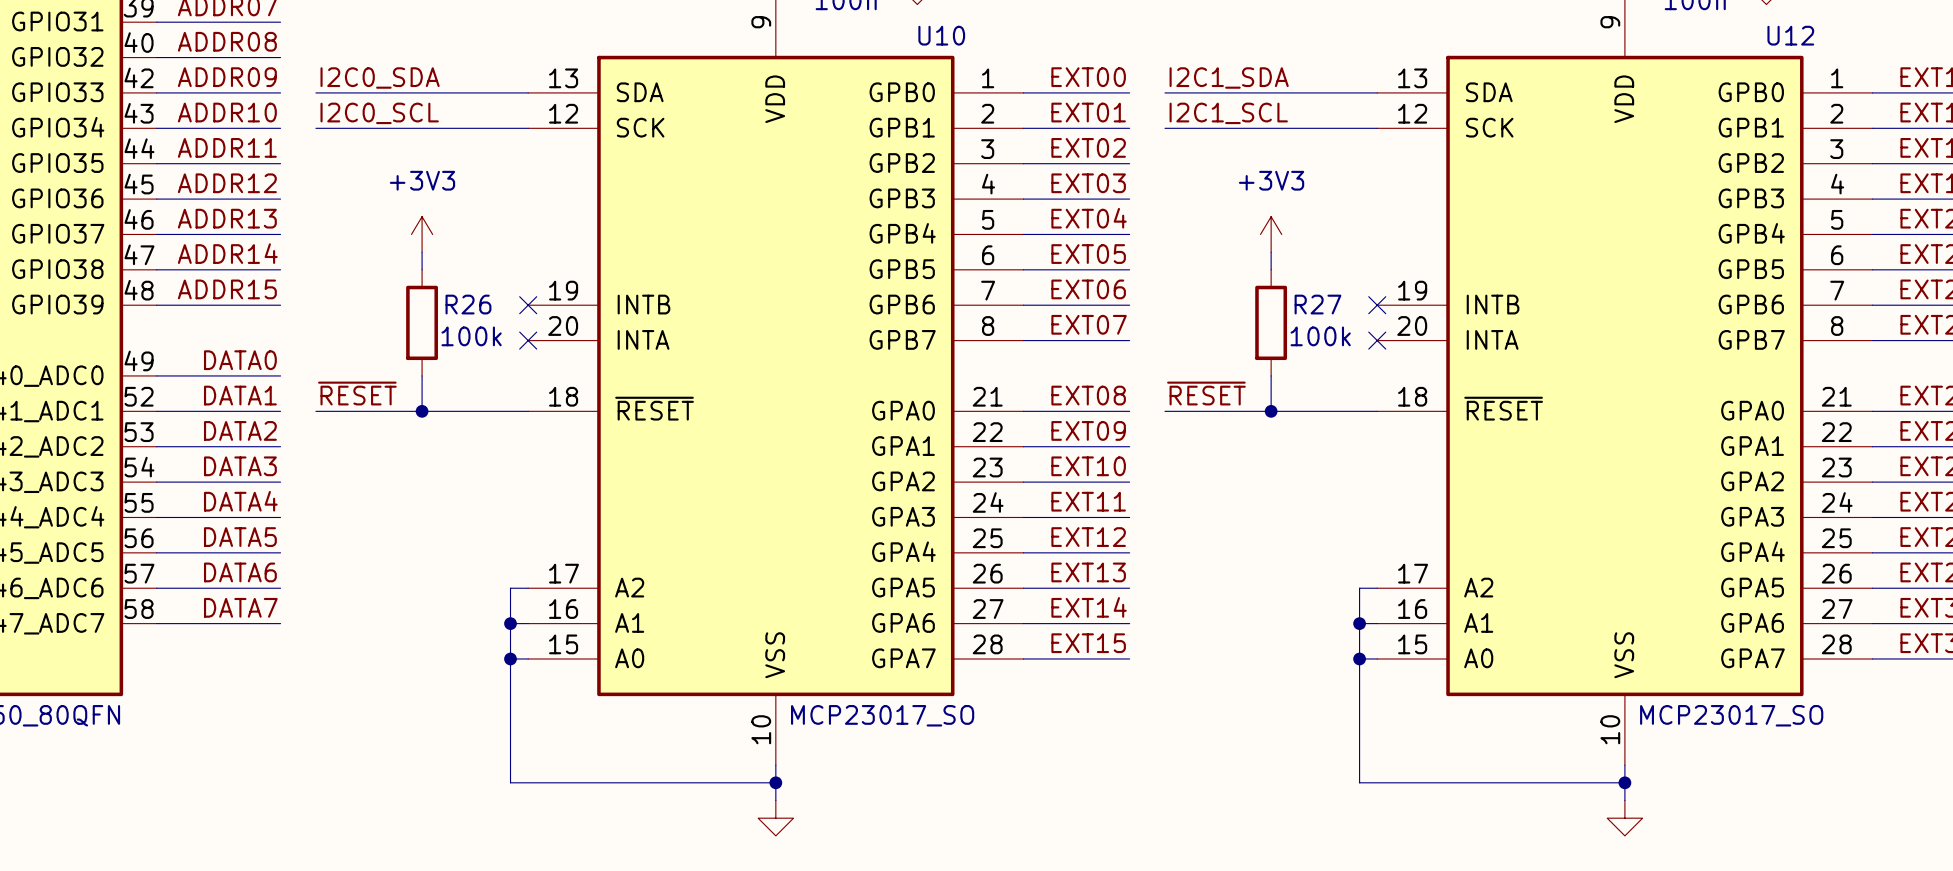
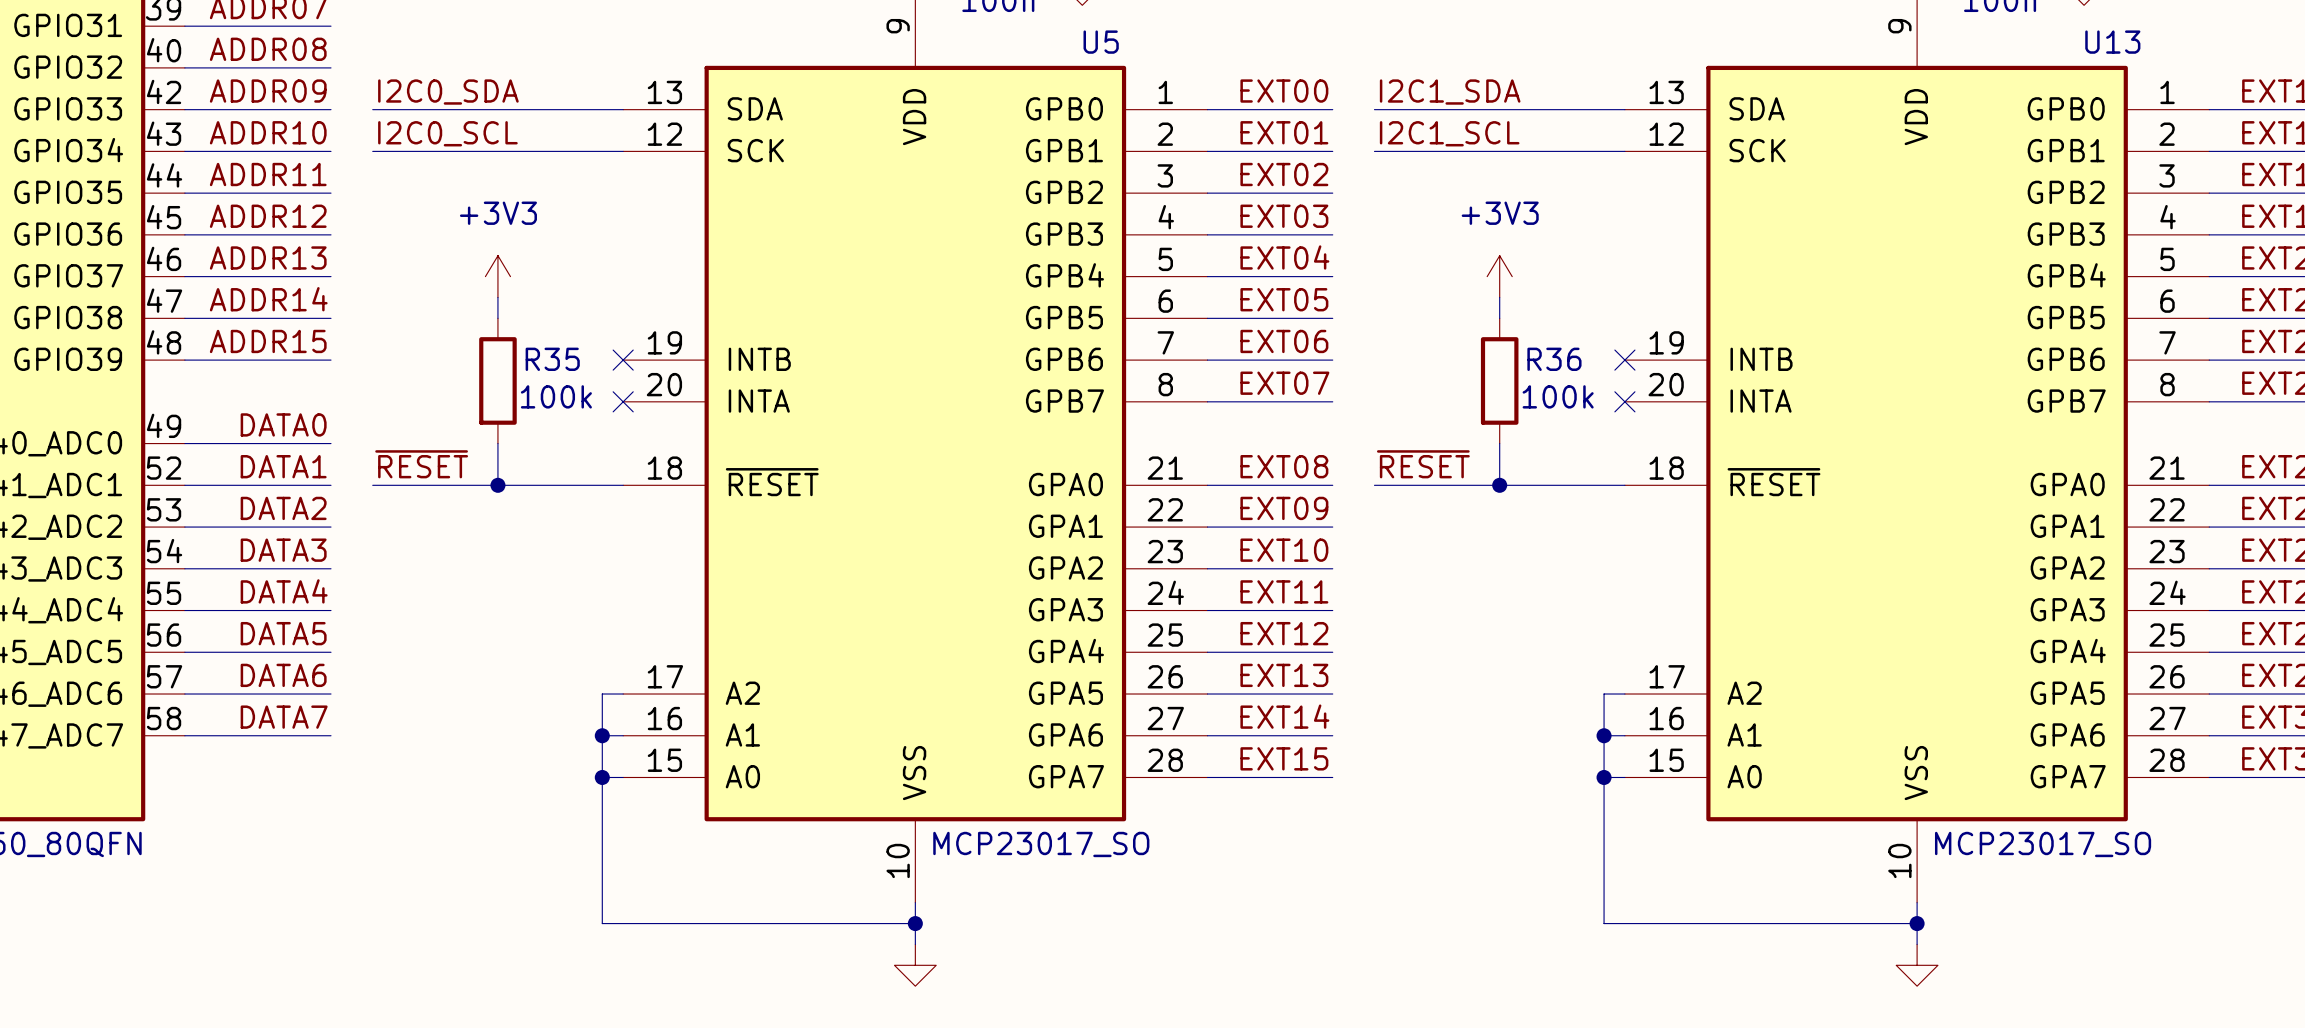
U10 name: U10 (941, 35) -> U5 (1101, 42)
U12 name: U12 (1790, 35) -> U13 (2112, 42)
R26 name: R26 (468, 304) -> R35 (552, 359)
R27 name: R27 (1317, 304) -> R36 (1554, 359)

